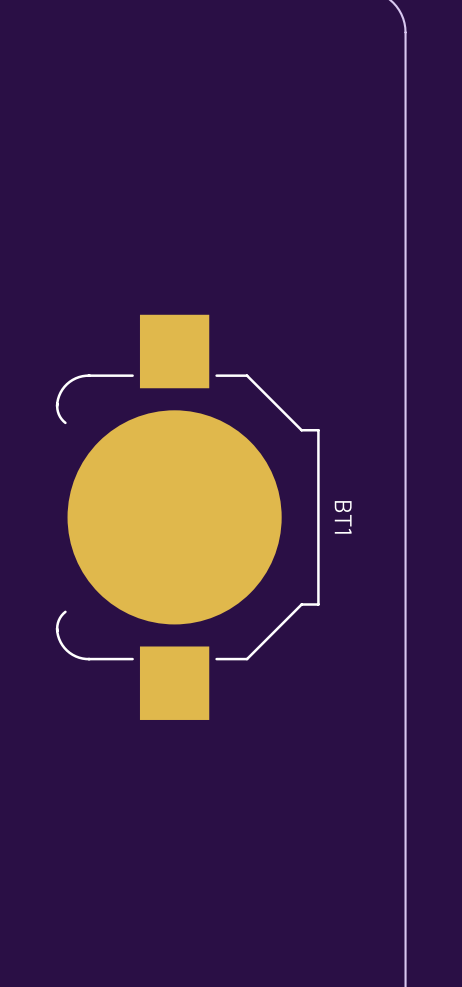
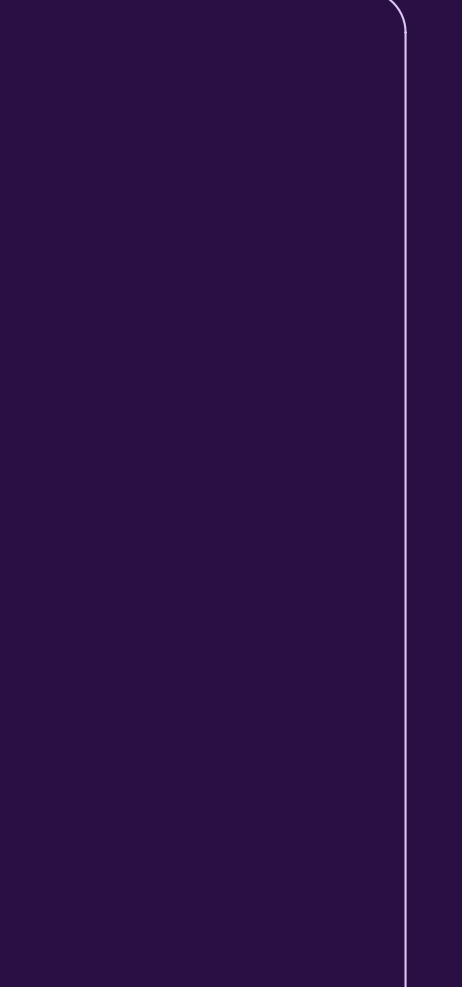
BT1: (187, 517) -> none

